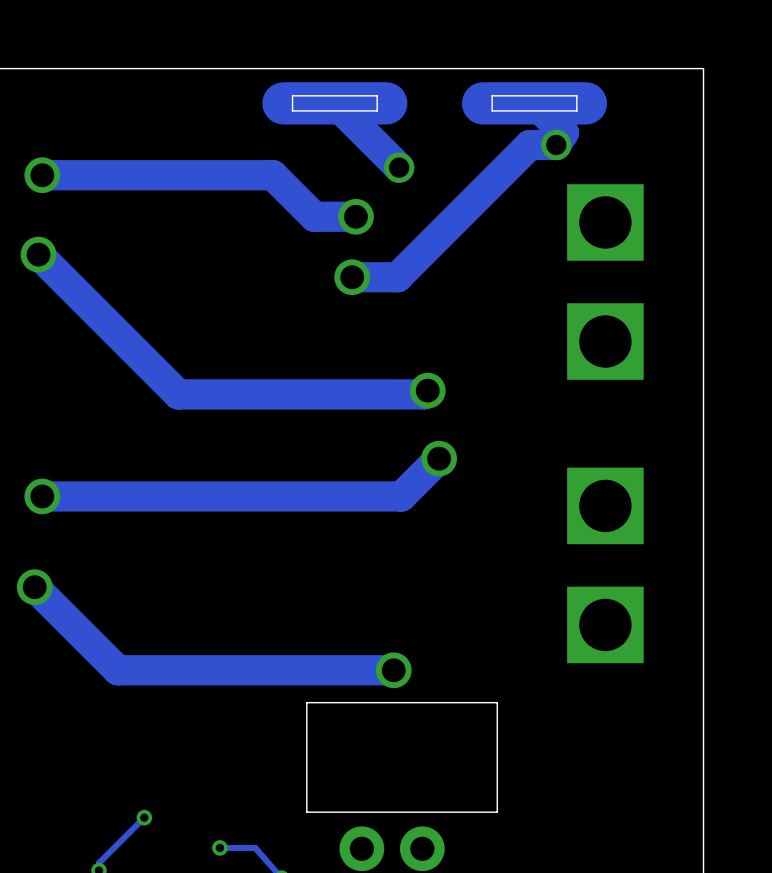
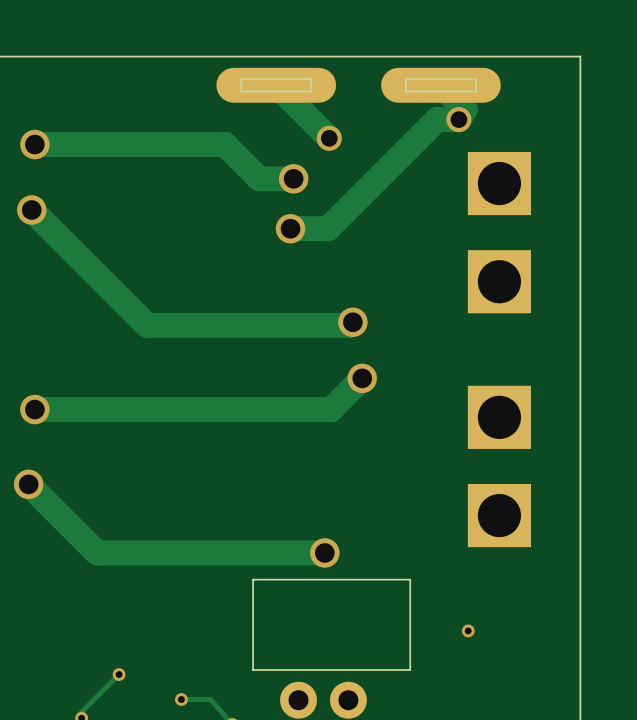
via: none -> (468, 630)

